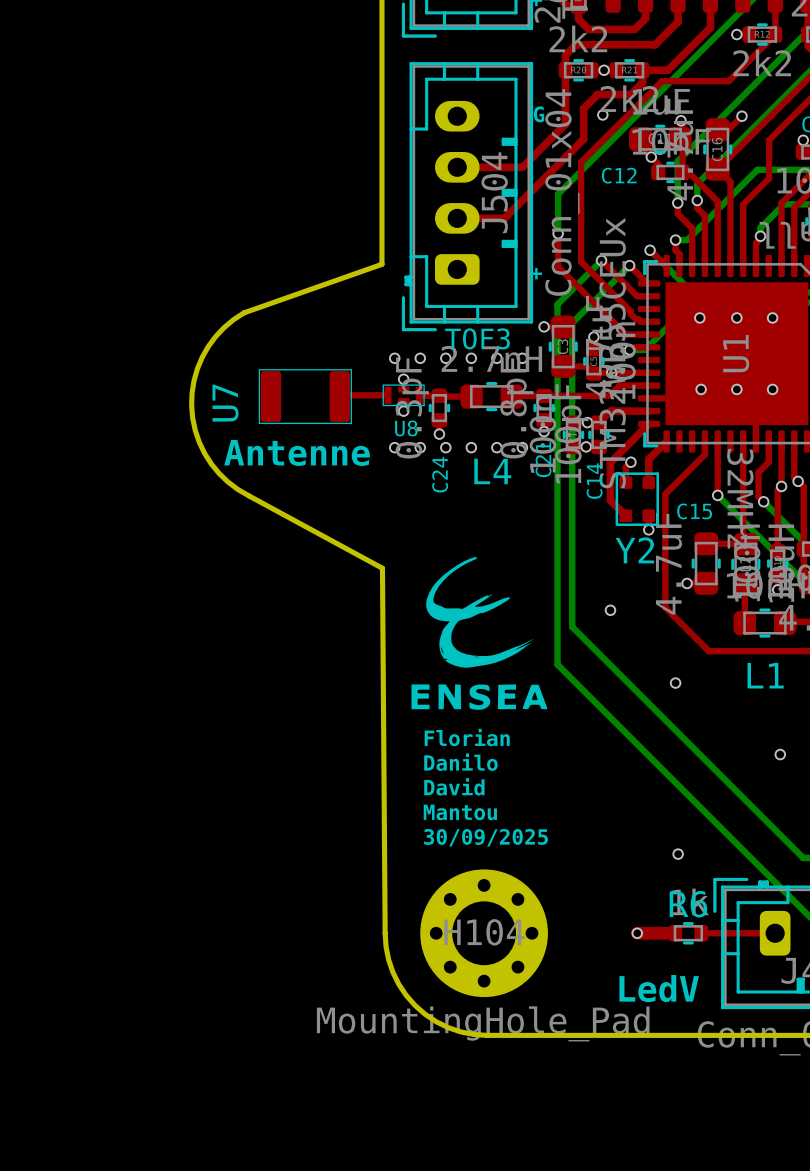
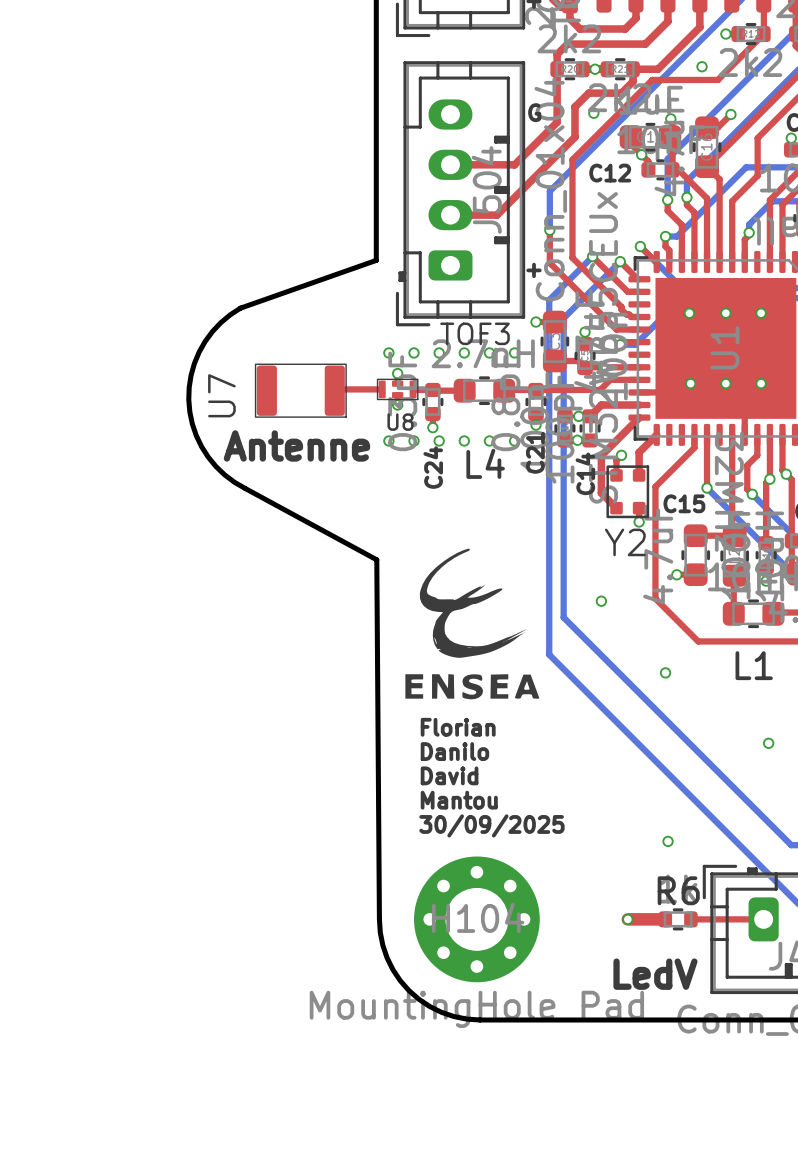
via: none -> (702, 66)

